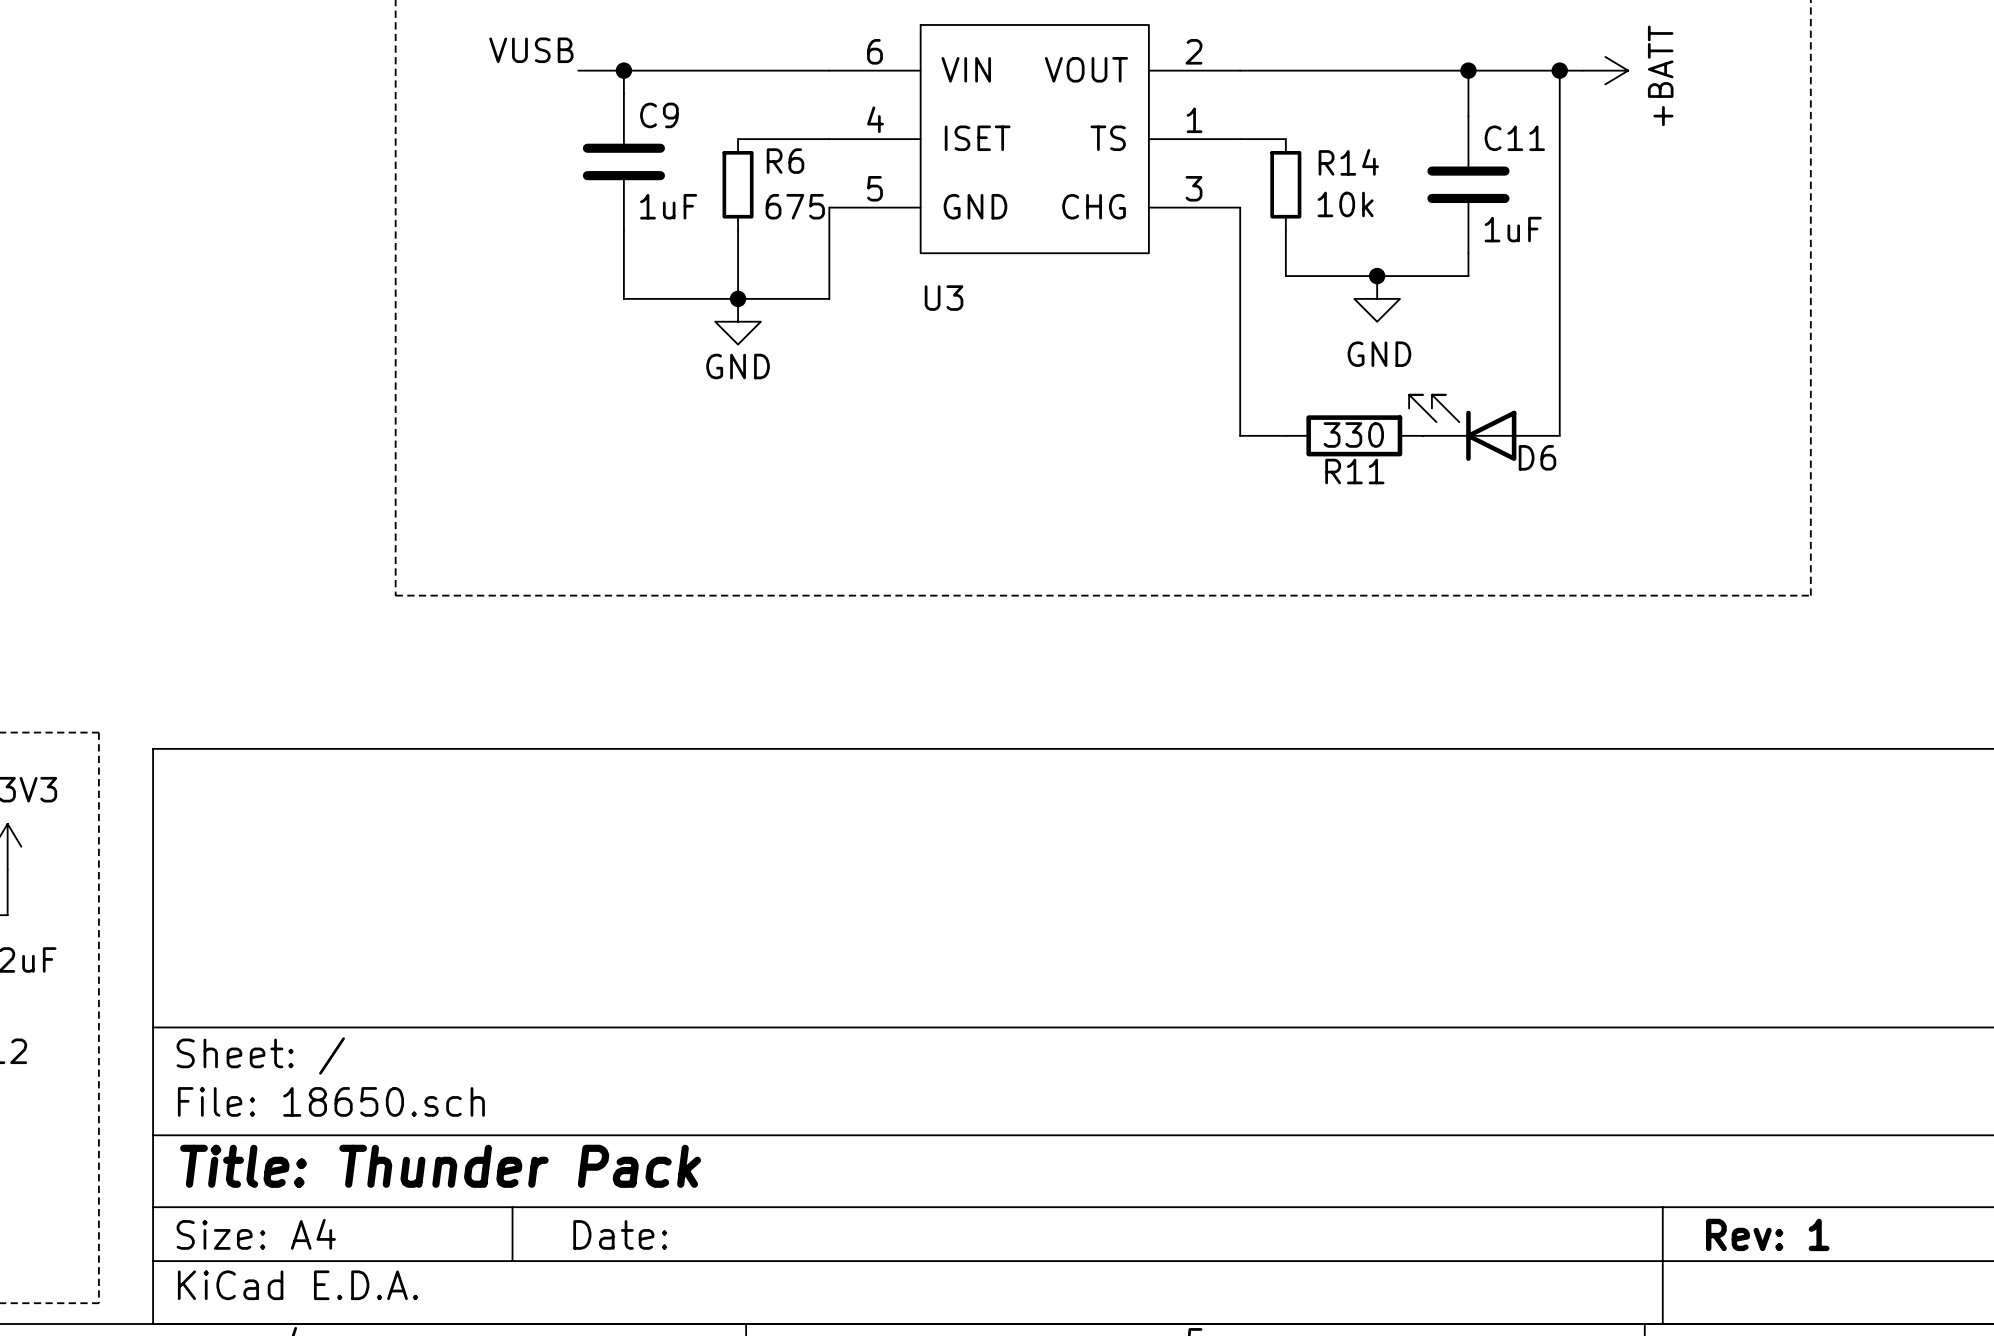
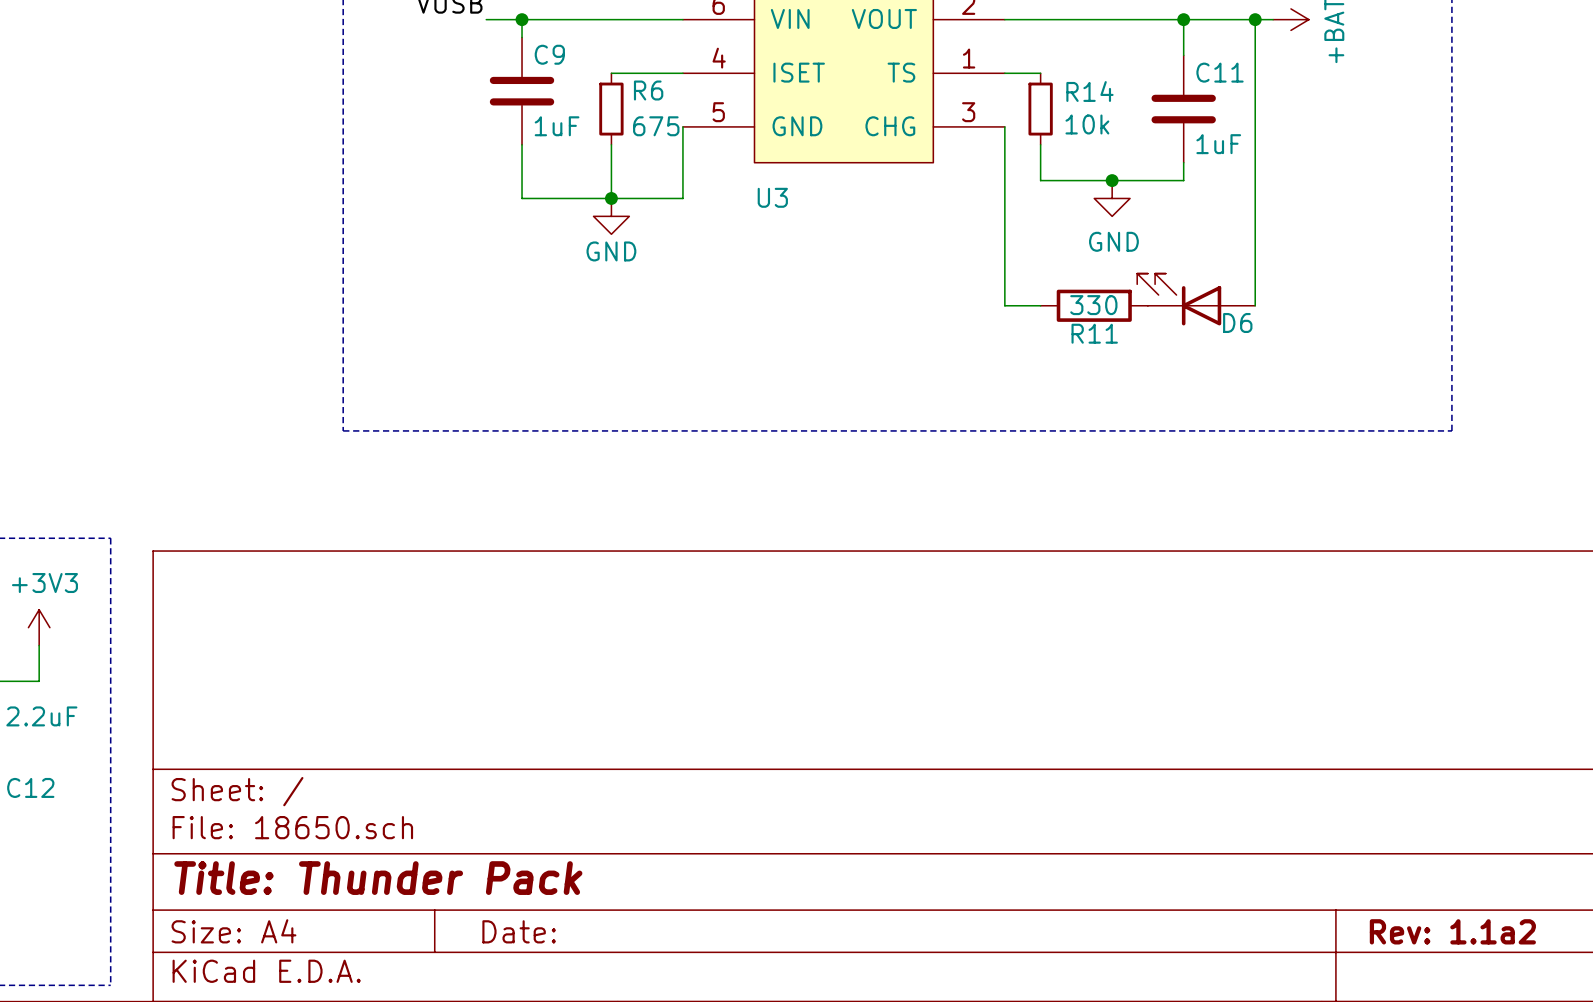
title block: Rev: 1 (1767, 1234) -> Rev: 1.1a2 (1452, 931)

